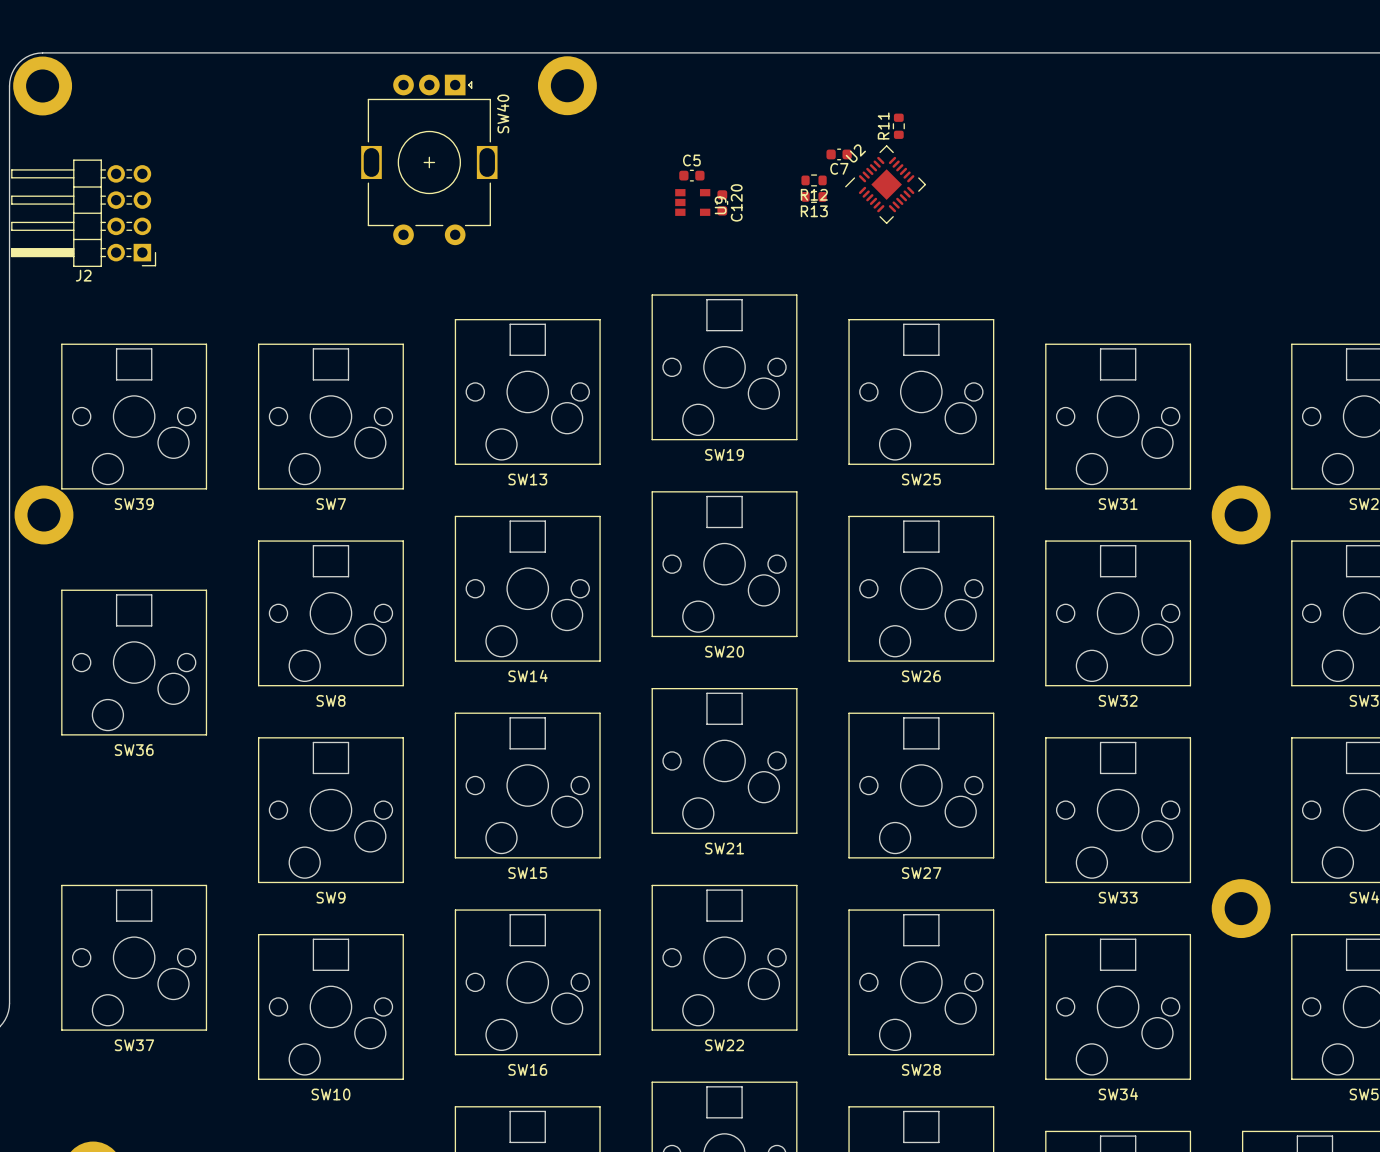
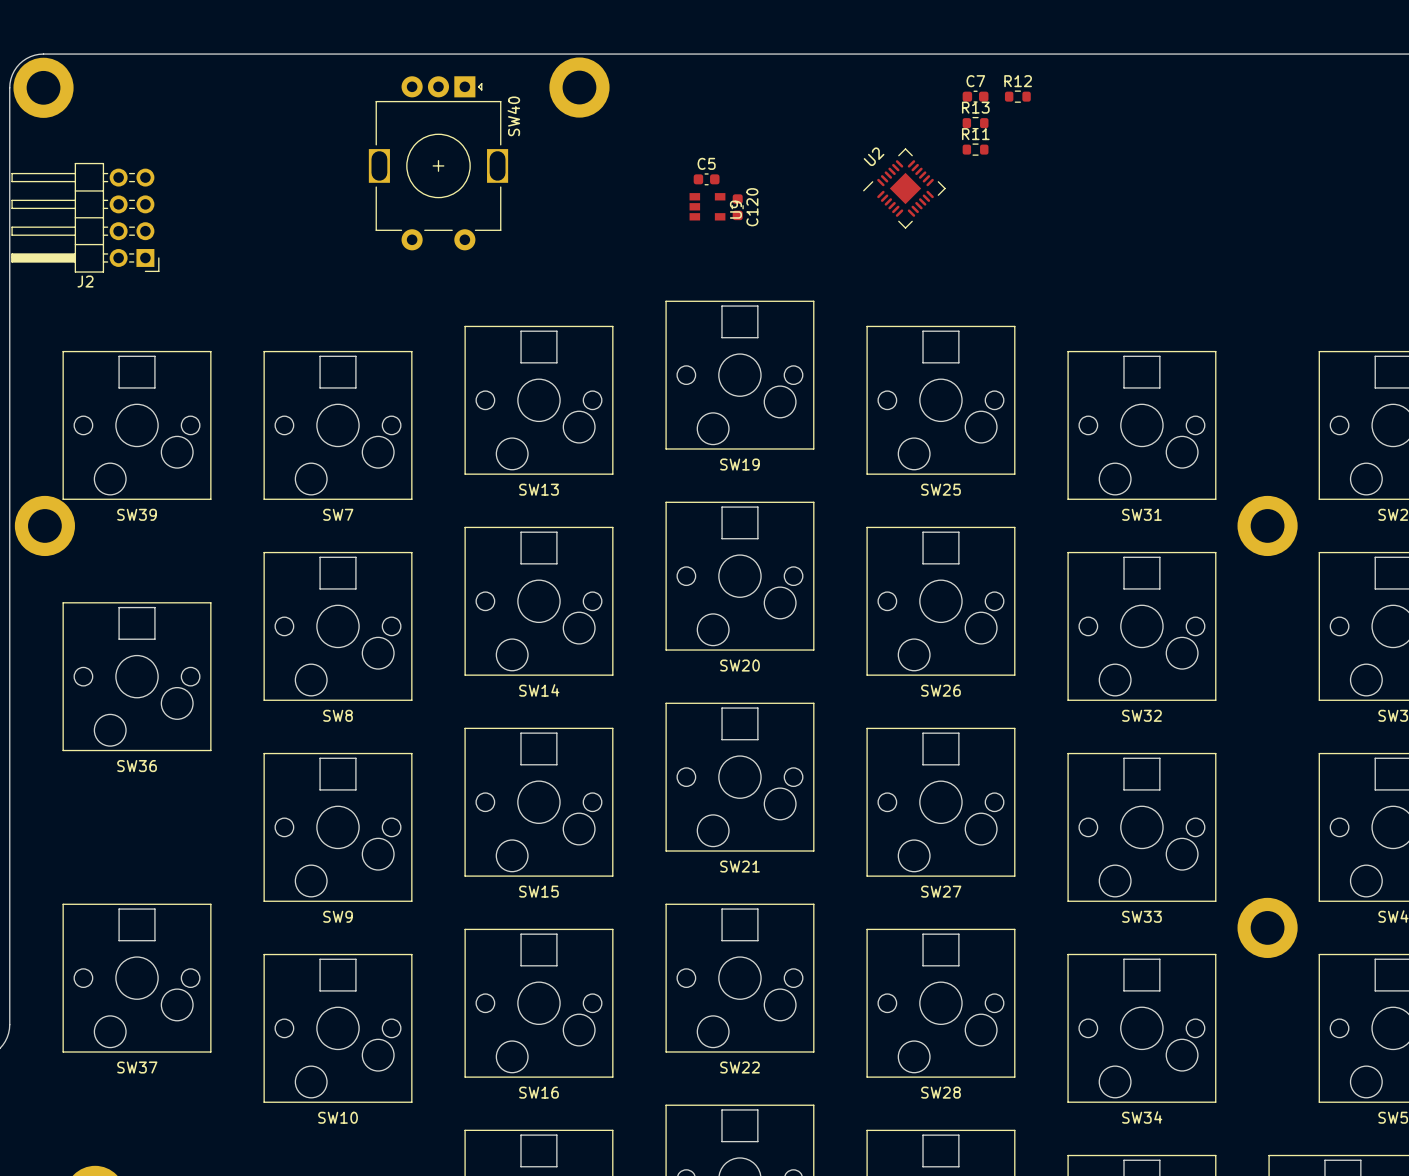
R11 rotation: 0° (898, 126) -> 90° clockwise (975, 149)
R11 position: (898, 126) -> (975, 149)
C7 position: (839, 154) -> (975, 96)
C7 name position: C7 (839, 168) -> C7 (975, 81)
R12 position: (814, 180) -> (1017, 96)
R12 name position: R12 (814, 194) -> R12 (1018, 81)
R13 position: (814, 196) -> (975, 123)
R13 name position: R13 (814, 211) -> R13 (975, 107)

